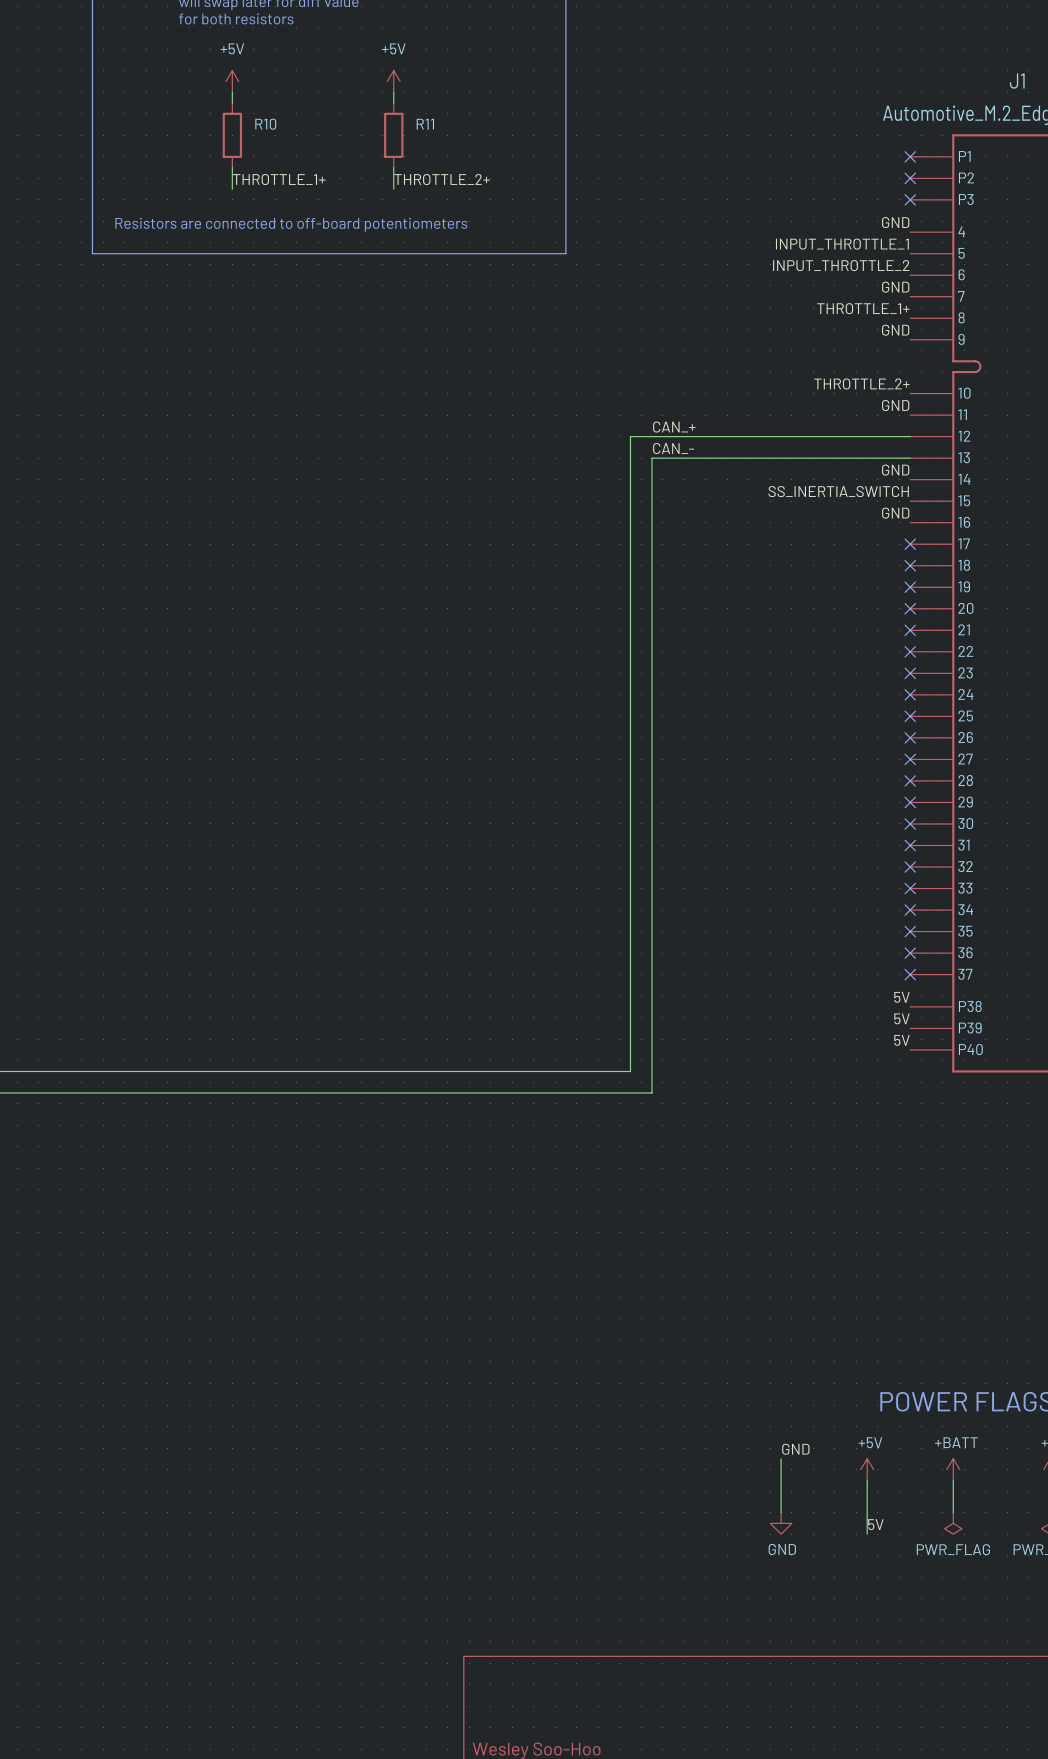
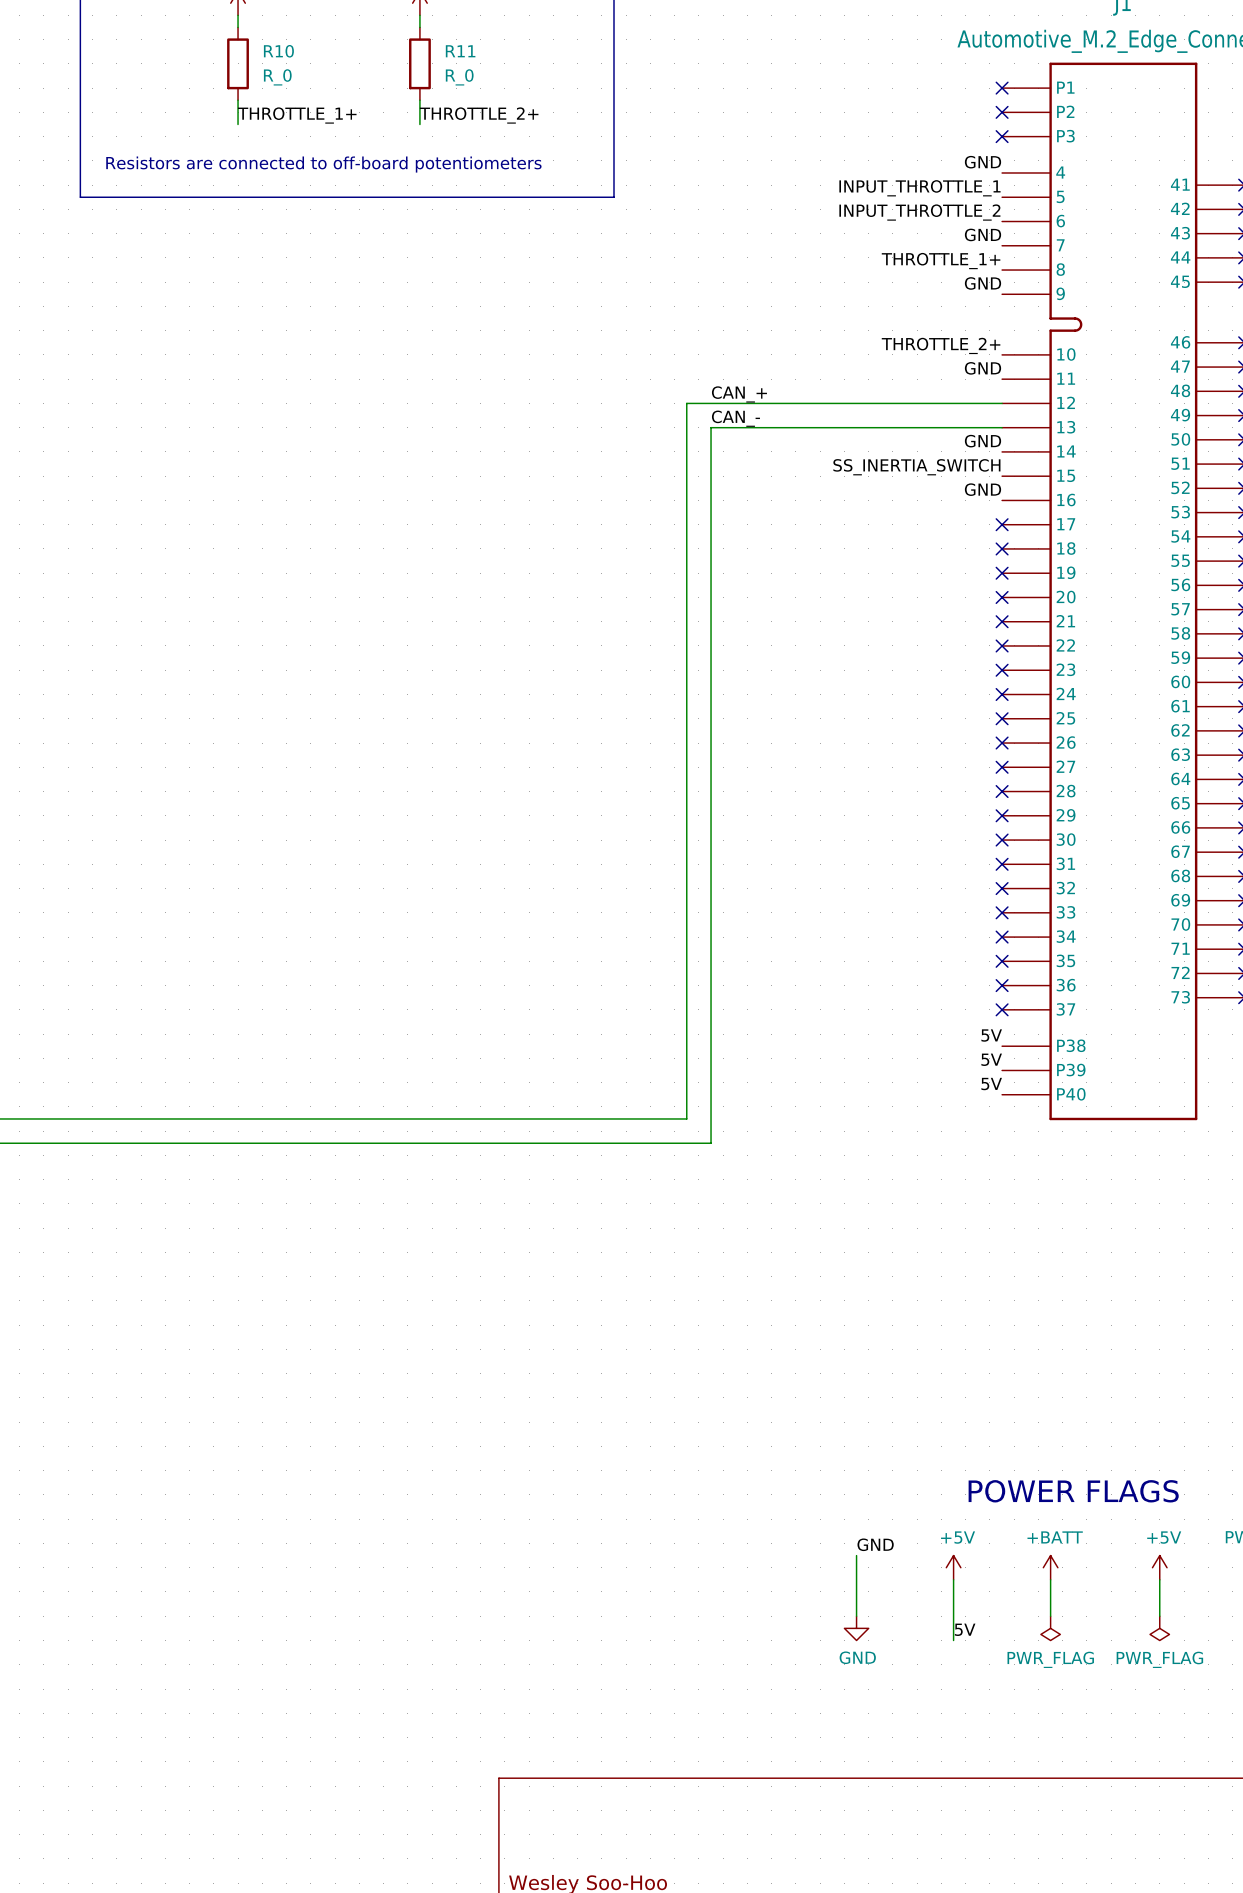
R10 value: none -> R_0 (277, 77)
R11 value: none -> R_0 (459, 77)

